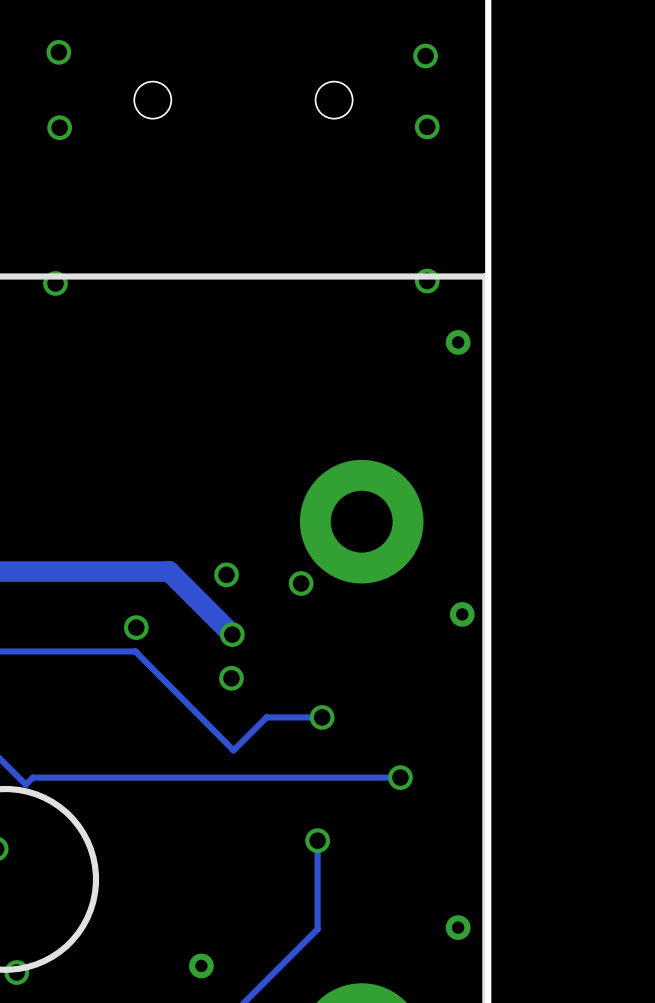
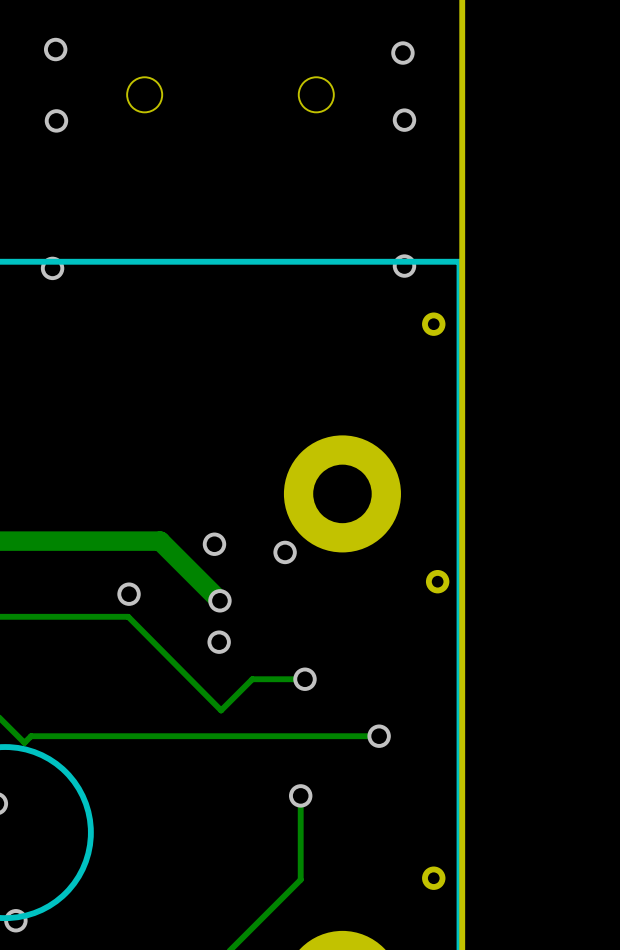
part: (201, 965) -> none

